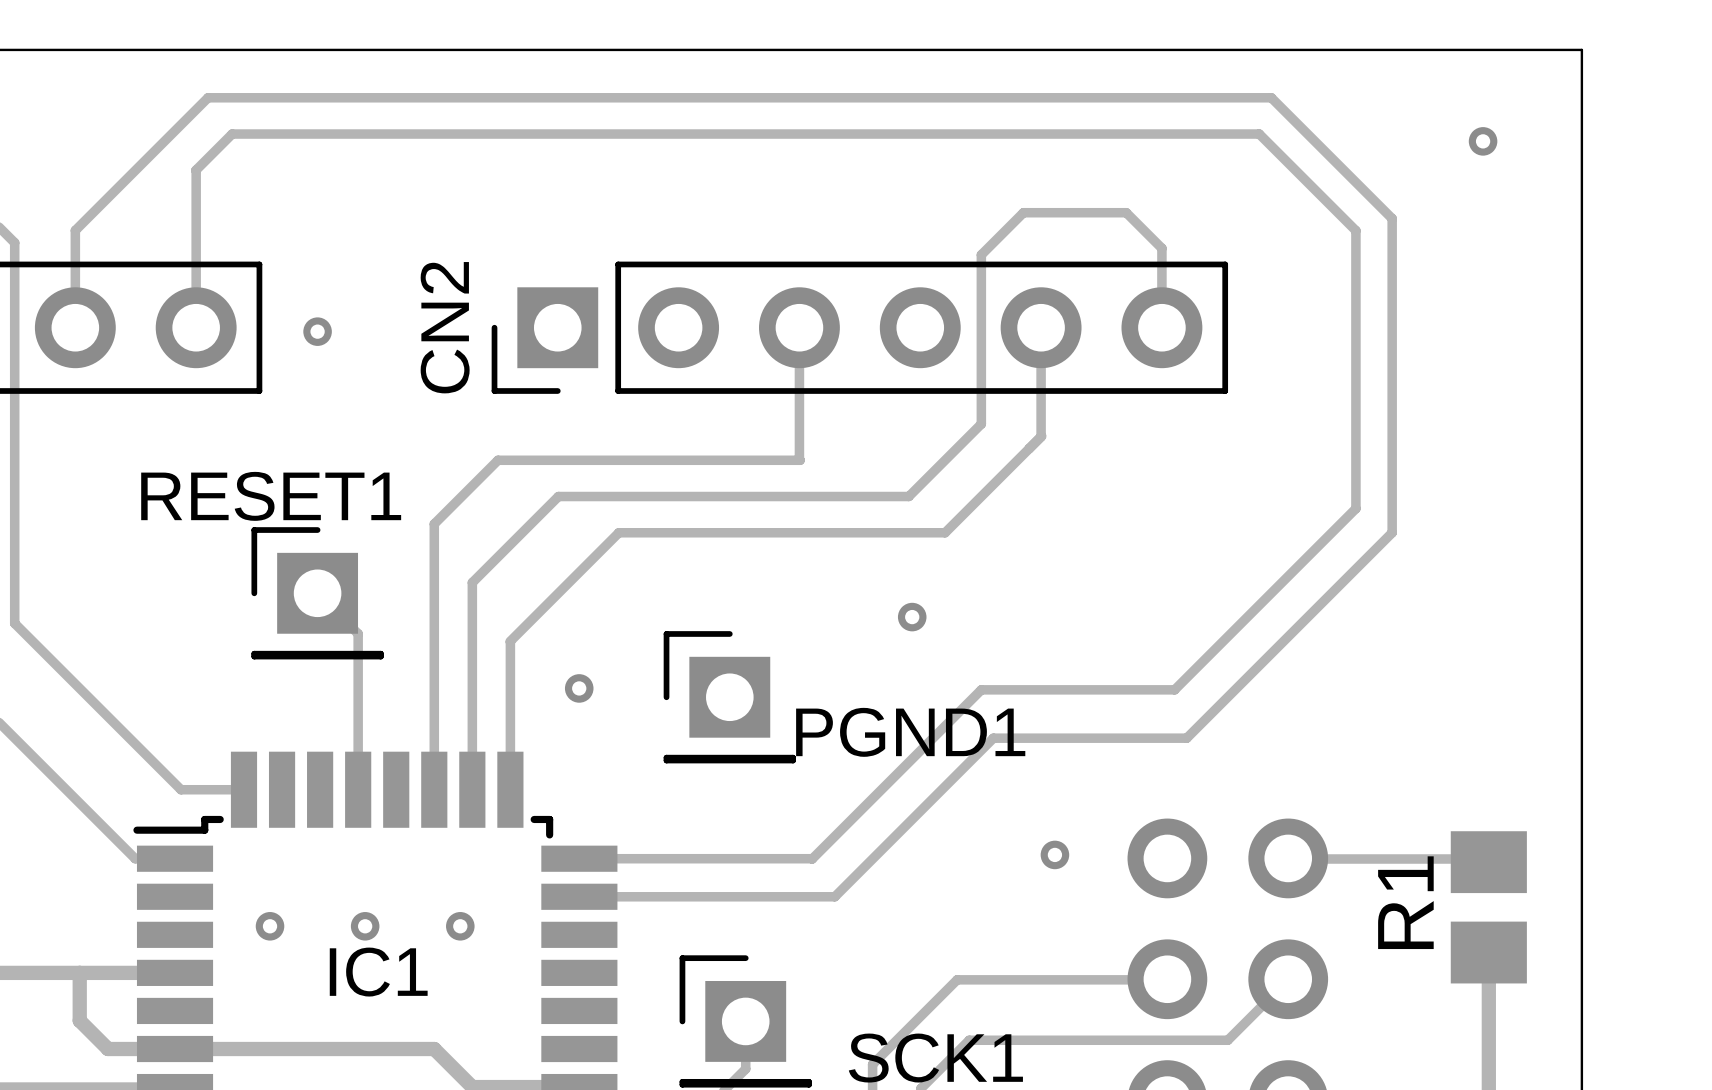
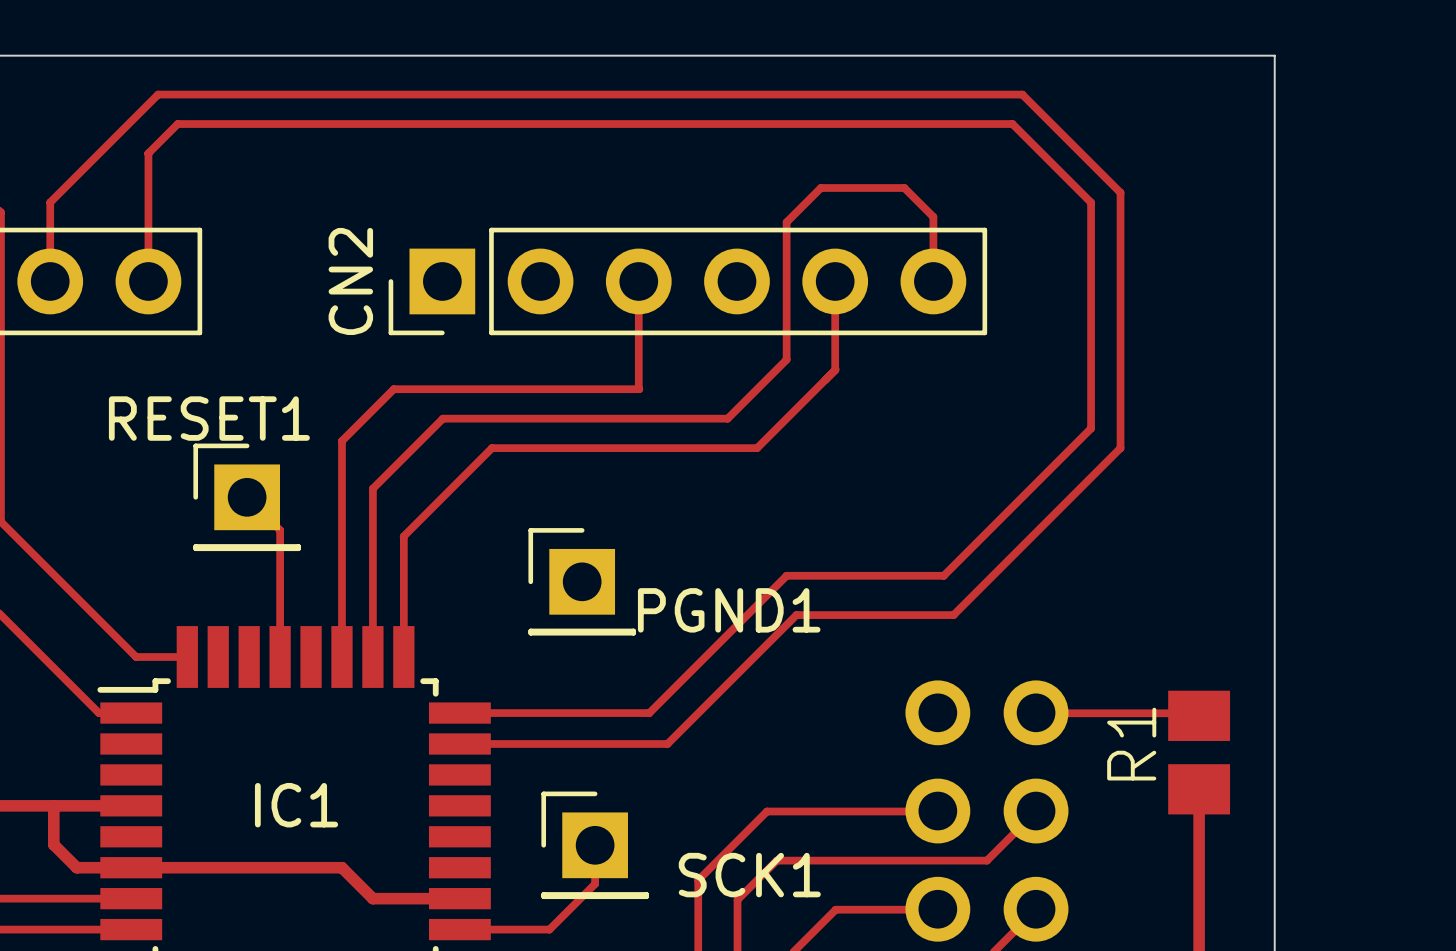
via: (1483, 141) -> none
via: (317, 331) -> none
via: (912, 617) -> none
via: (579, 688) -> none
via: (1054, 854) -> none
via: (270, 926) -> none
via: (365, 926) -> none
via: (460, 926) -> none

